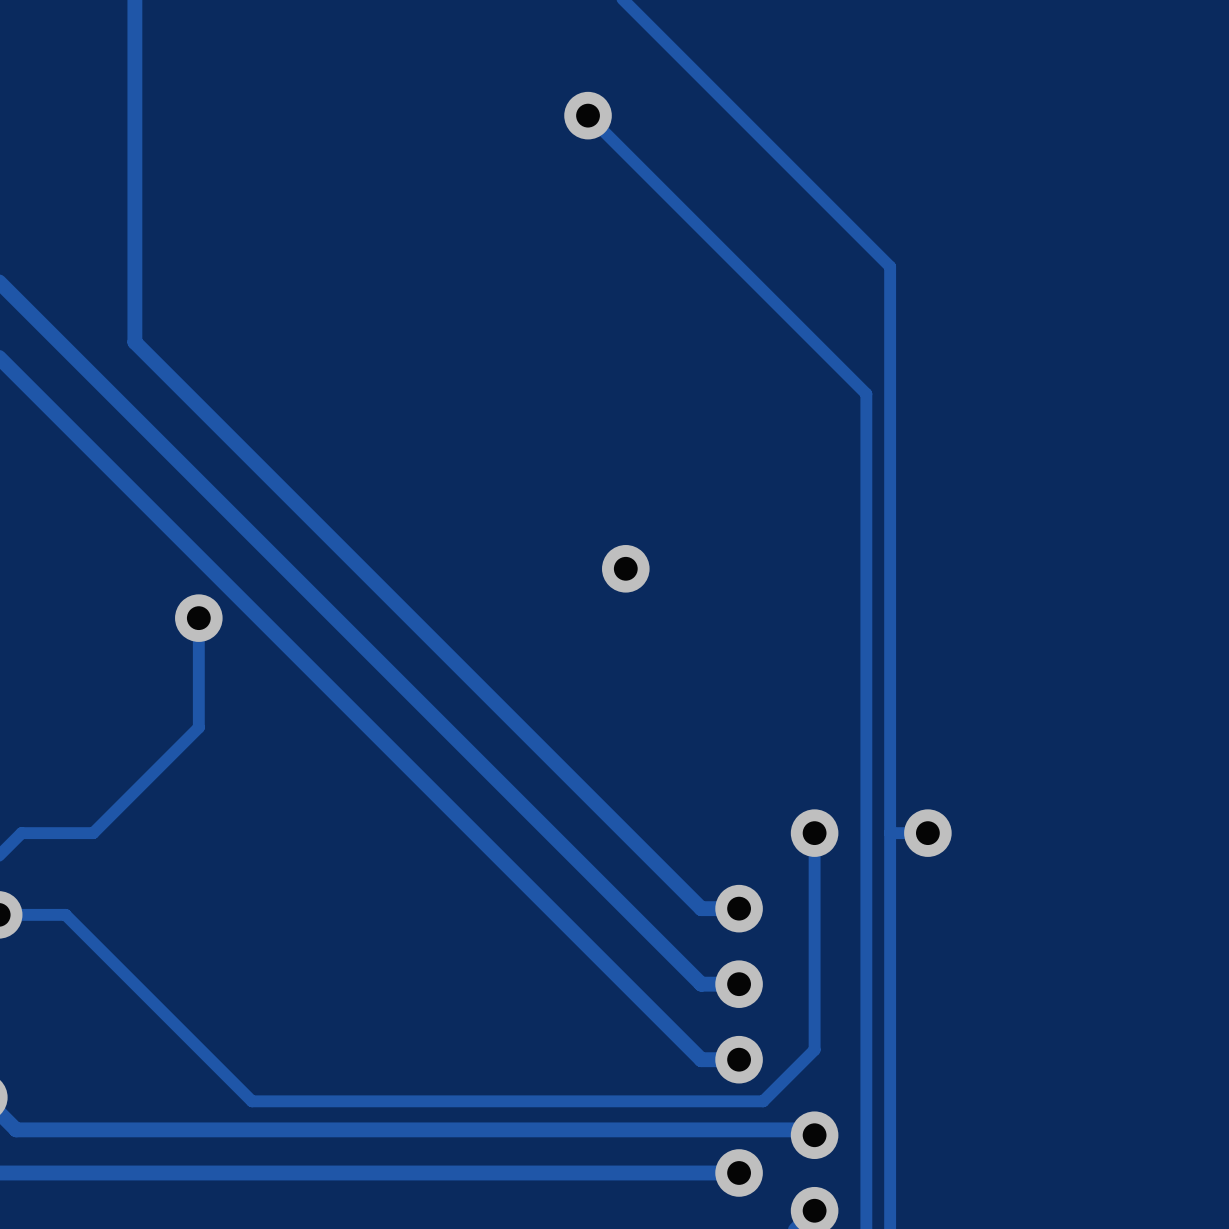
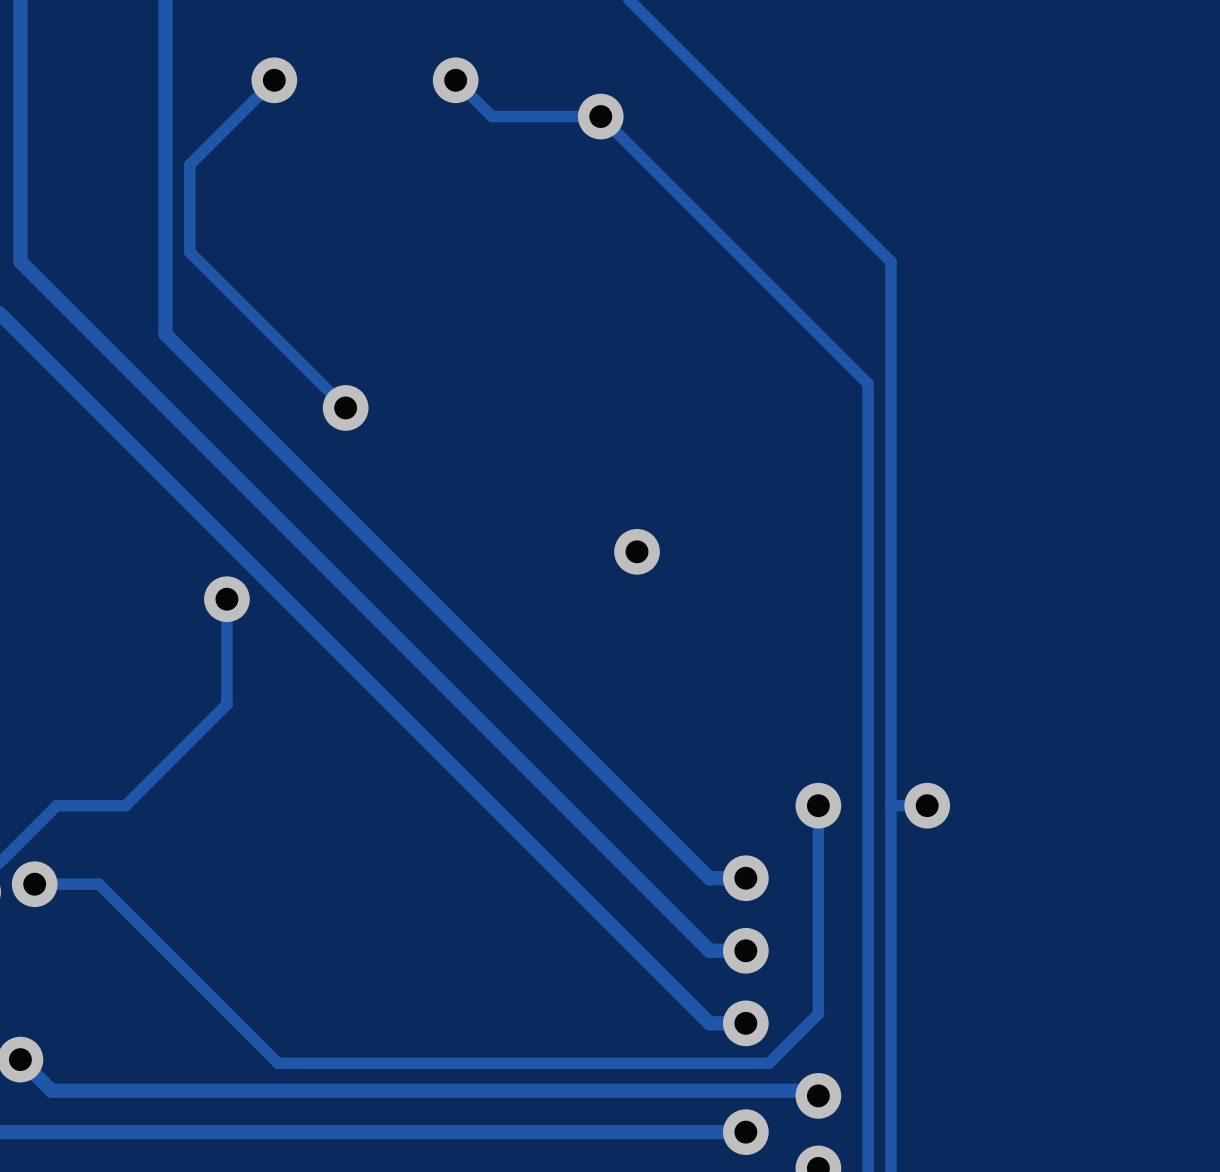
track: none -> (274, 80) (189, 164) (189, 252) (345, 407)
via: none -> (274, 80)
track: none -> (455, 80) (491, 116) (600, 116)
via: none -> (455, 80)
via: none -> (345, 407)

